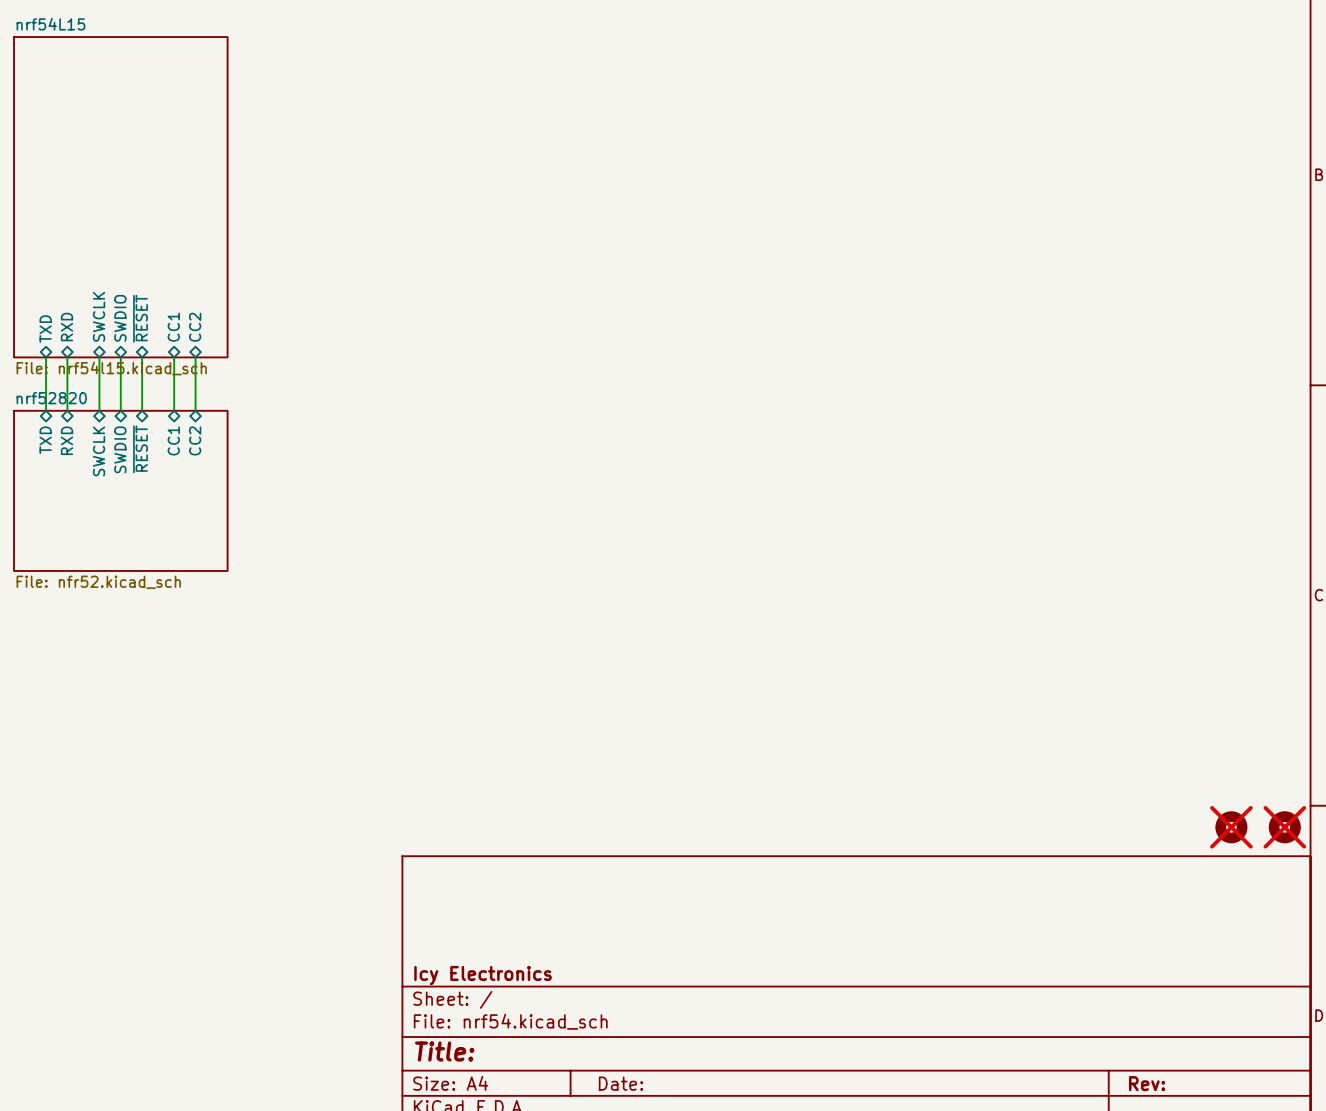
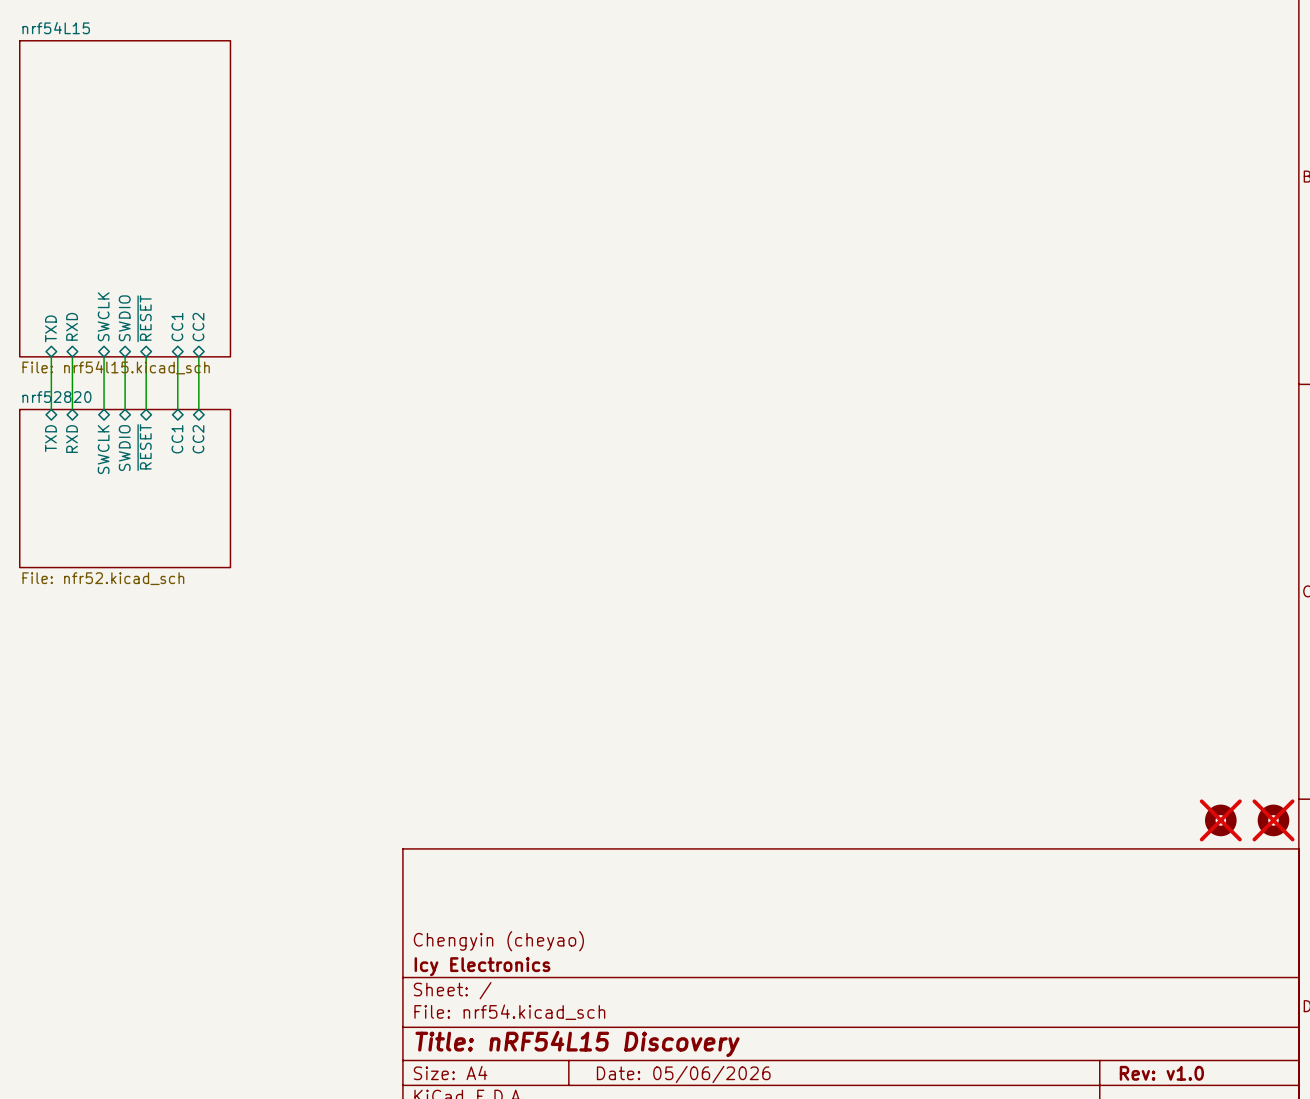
title block: none -> Chengyin (cheyao) (498, 941)
title block: Title: (444, 1051) -> Title: nRF54L15 Discovery (577, 1043)
title block: Date: (620, 1083) -> Date: 05/06/2026 (683, 1074)
title block: Rev: (1147, 1083) -> Rev: v1.0 (1161, 1073)

